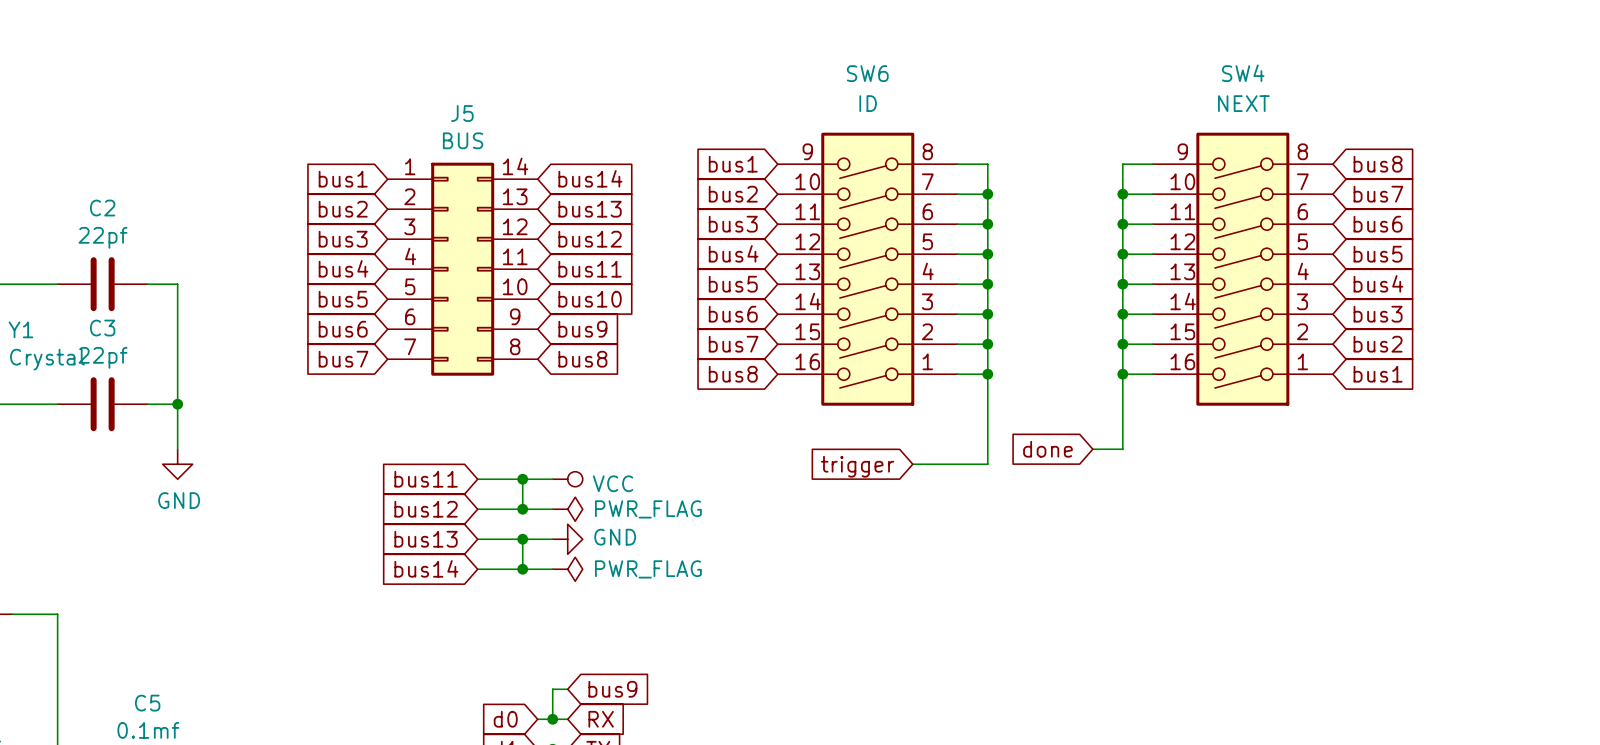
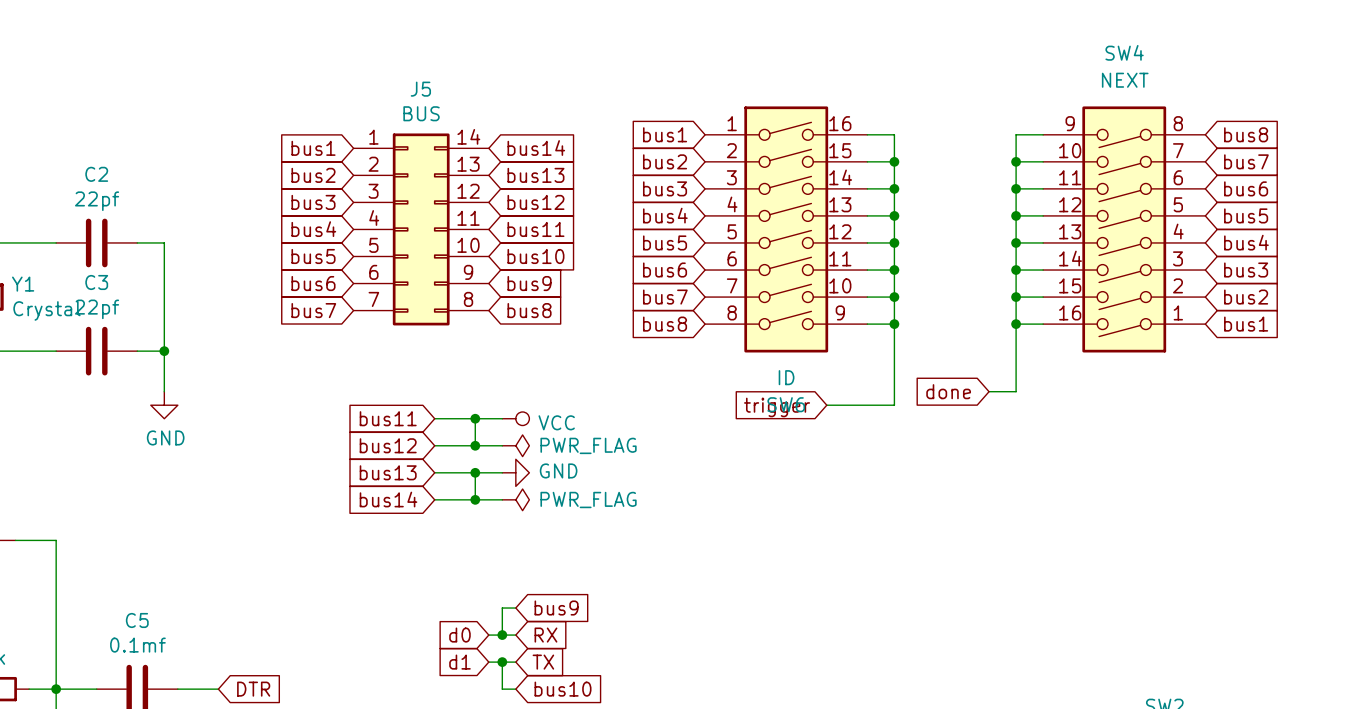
SW6 rotation: 0° (867, 269) -> 180° (786, 229)

